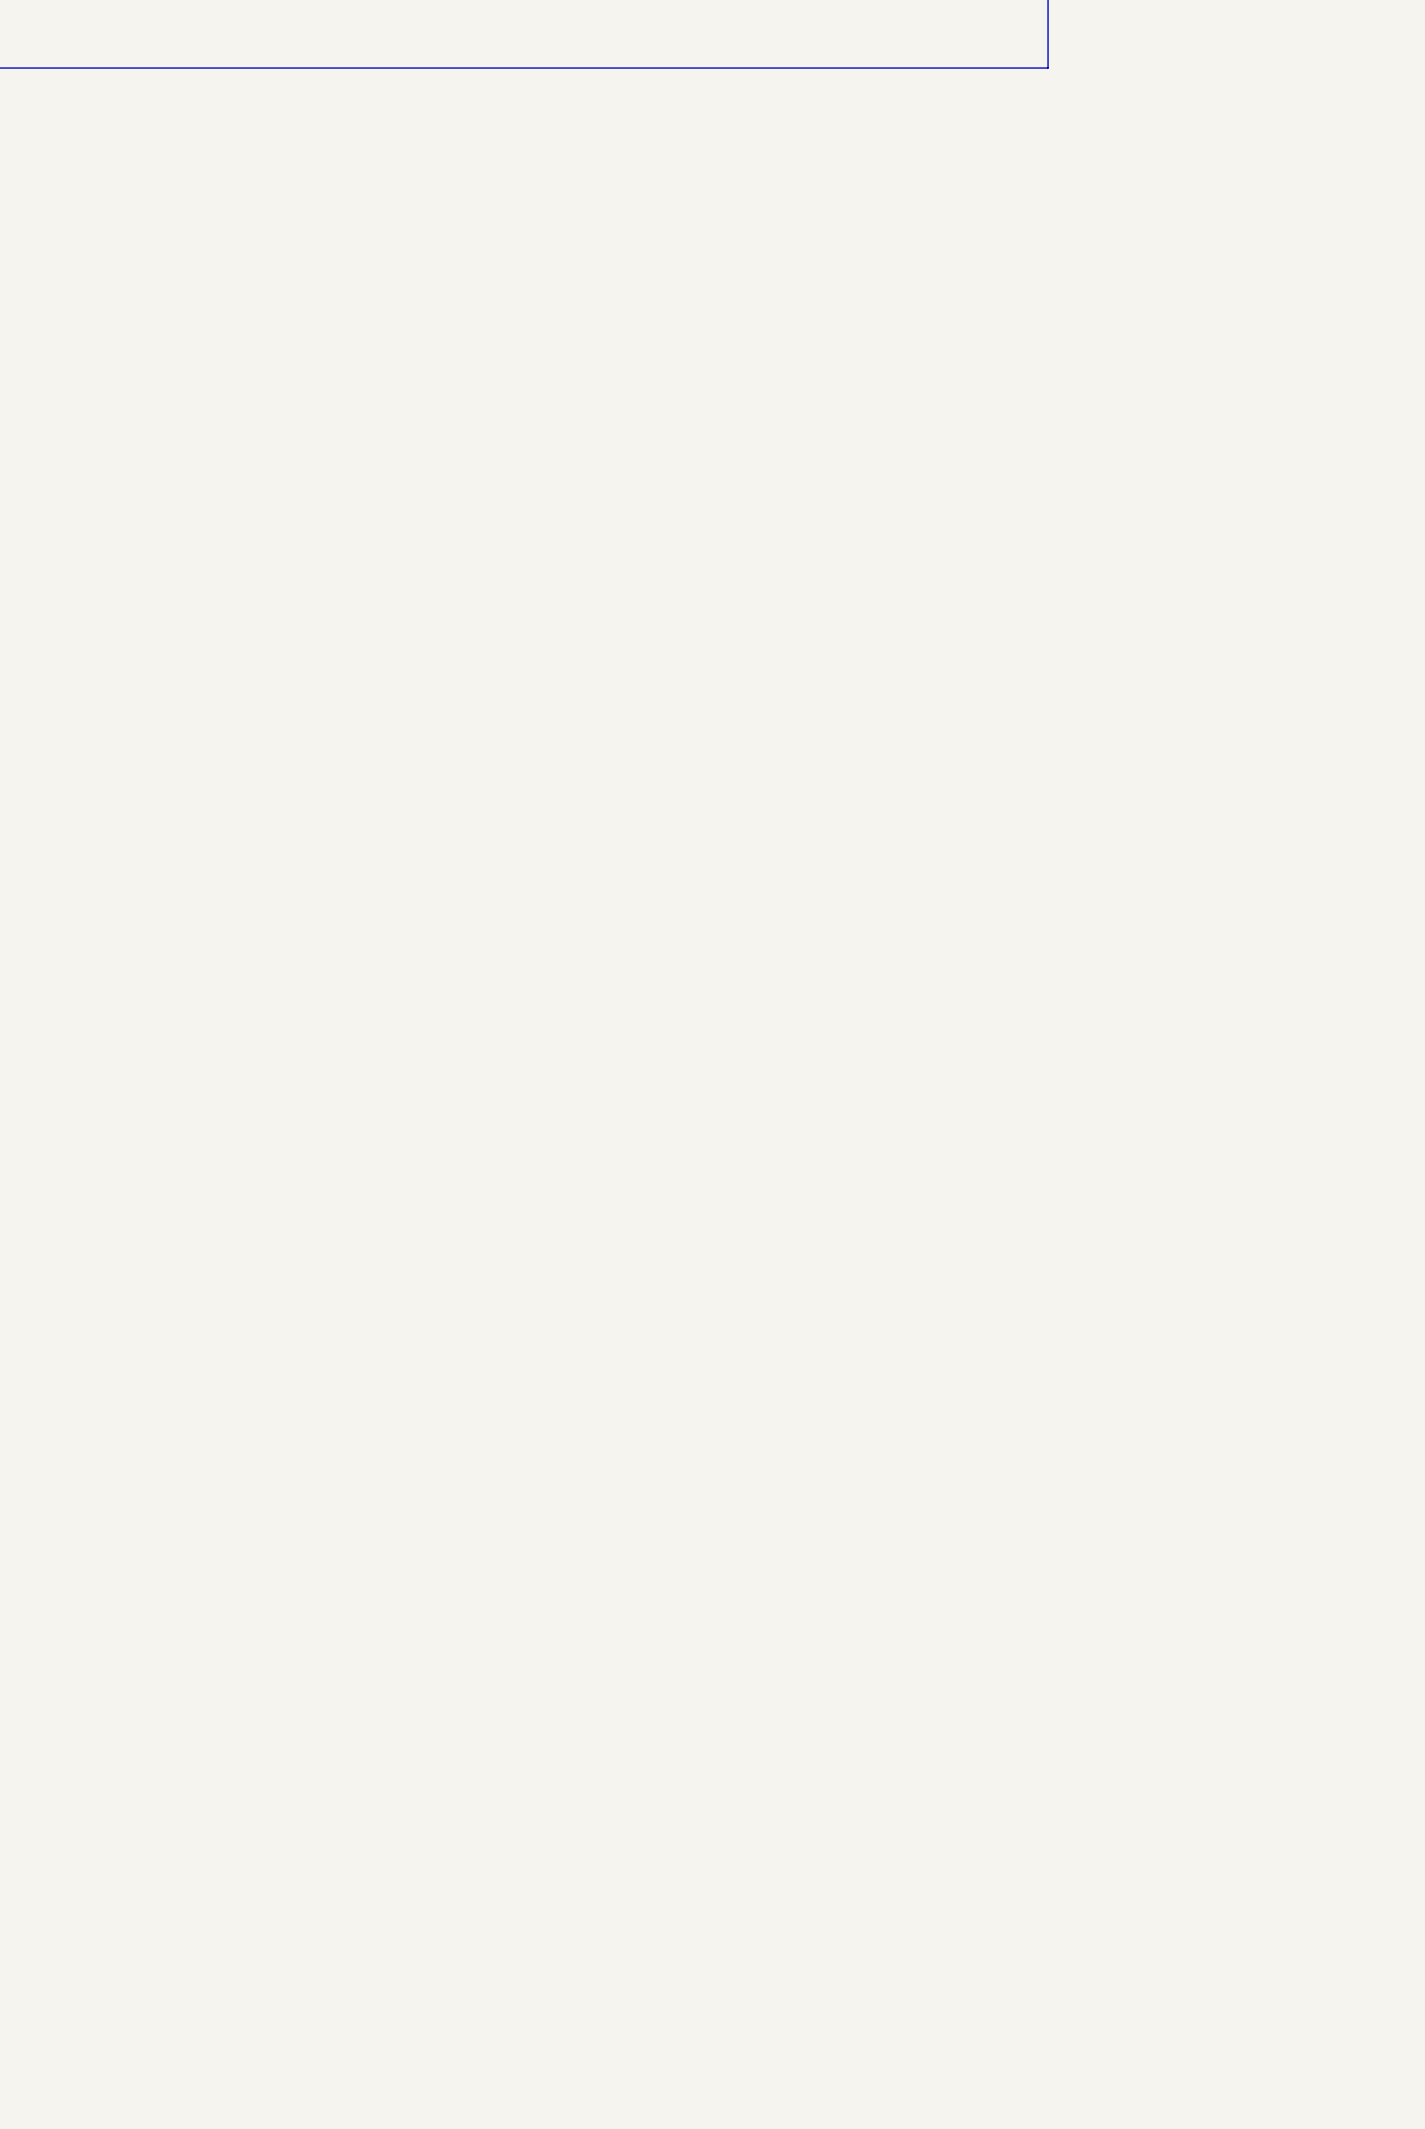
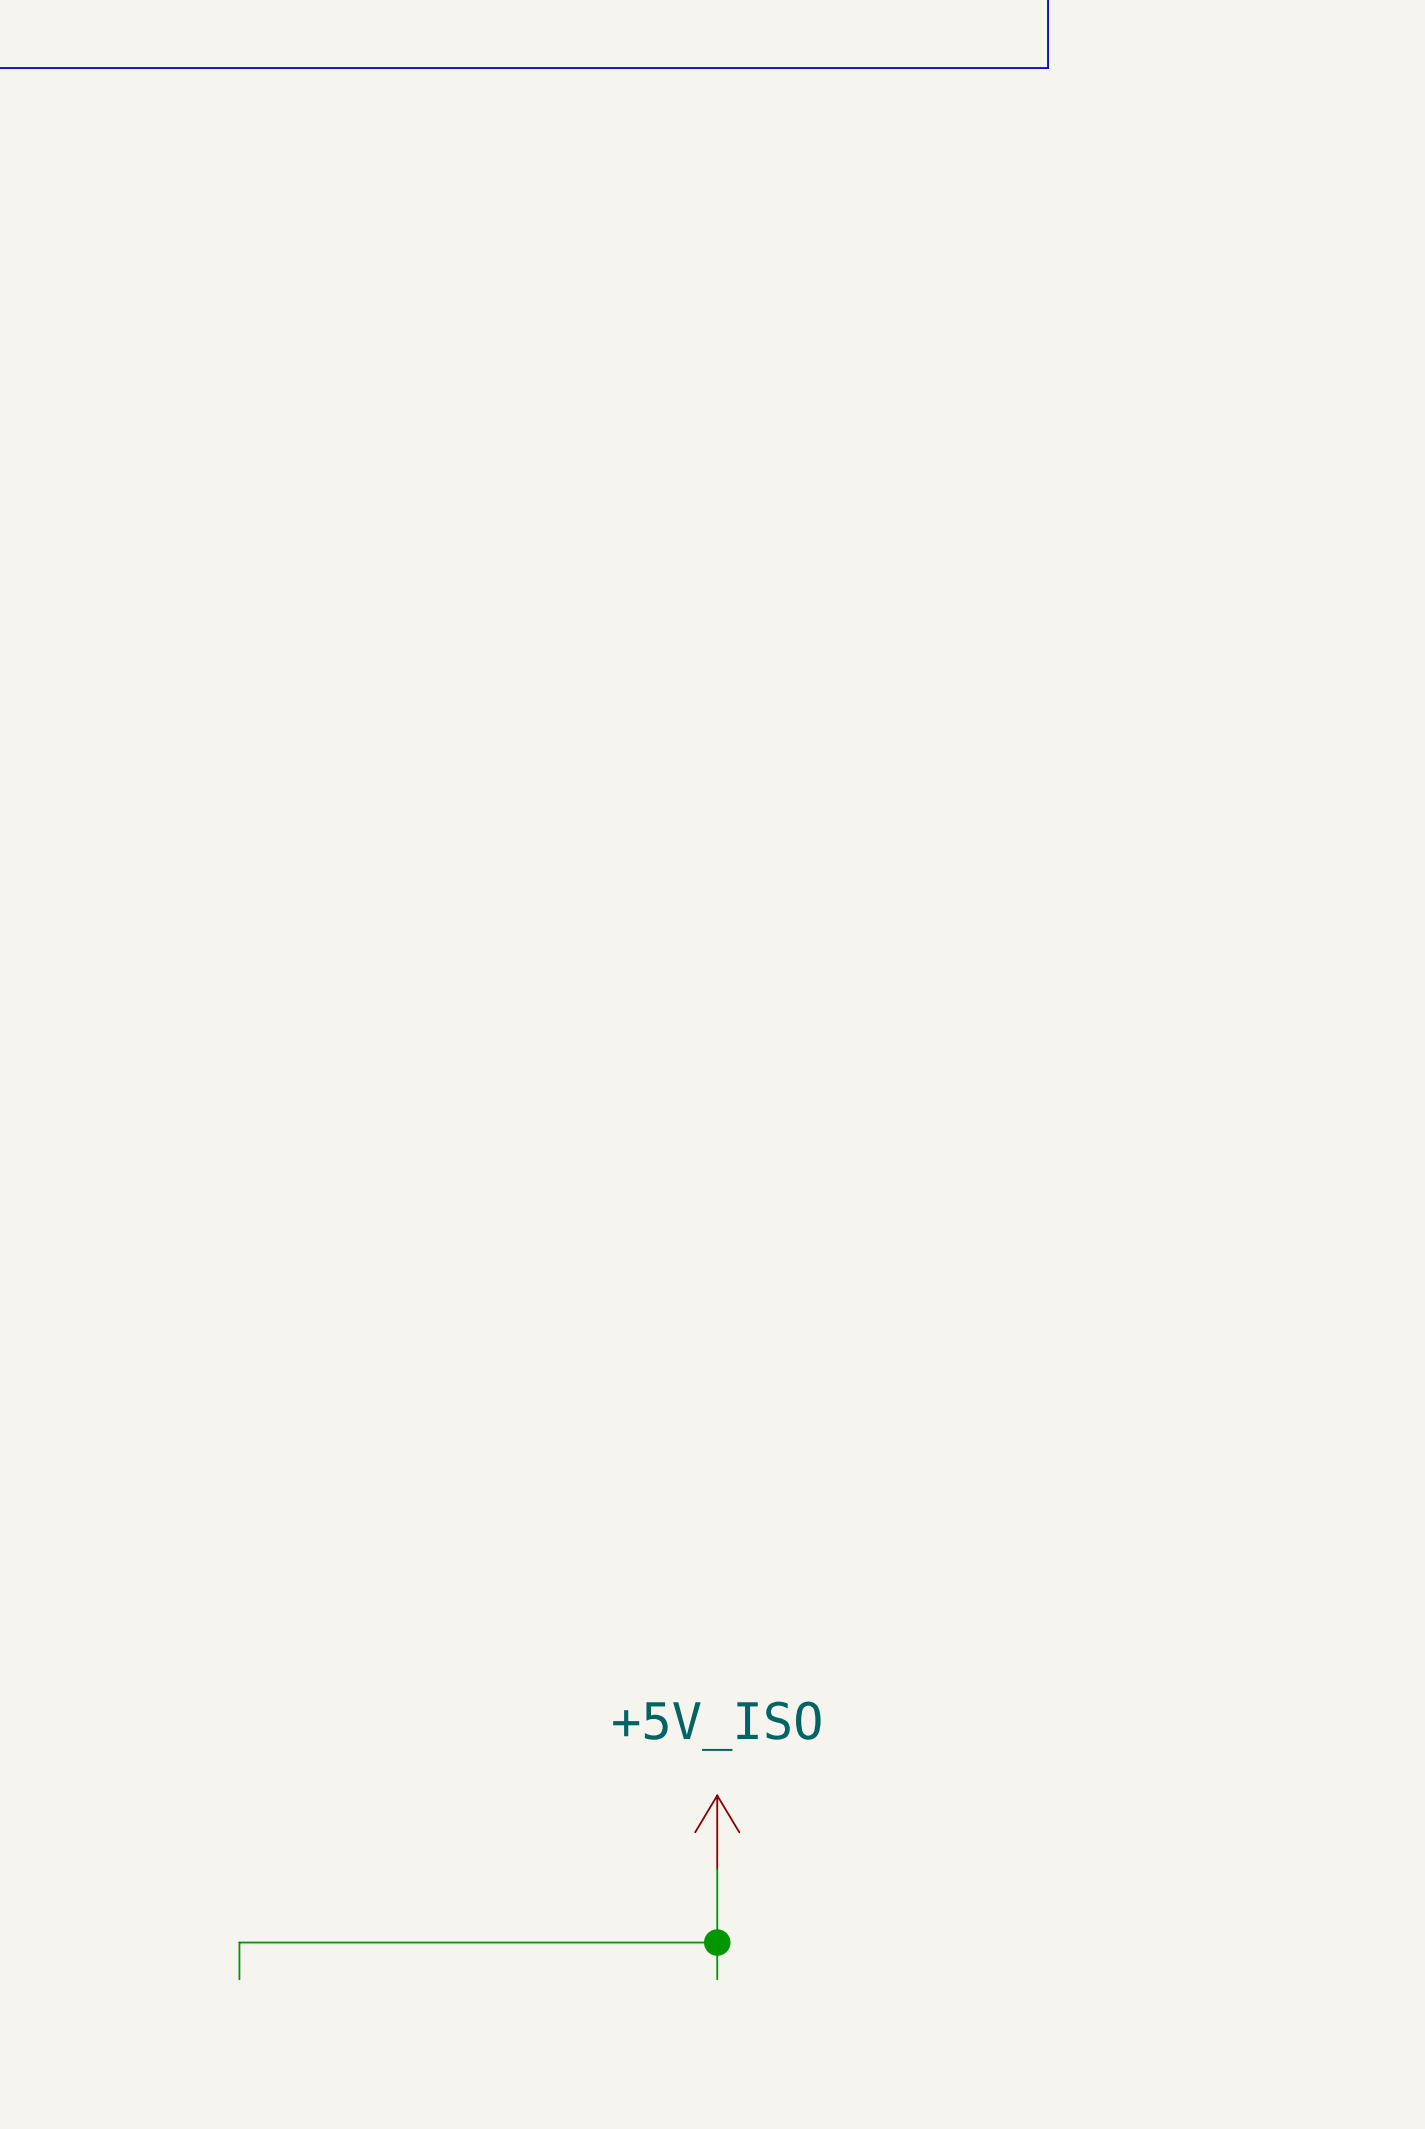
power symbol: none -> +5V_ISO (717, 1832)
wire: none -> (717, 1869) (717, 1979)
wire: none -> (717, 1942) (239, 1942) (239, 1979)
junction: none -> (717, 1942)

